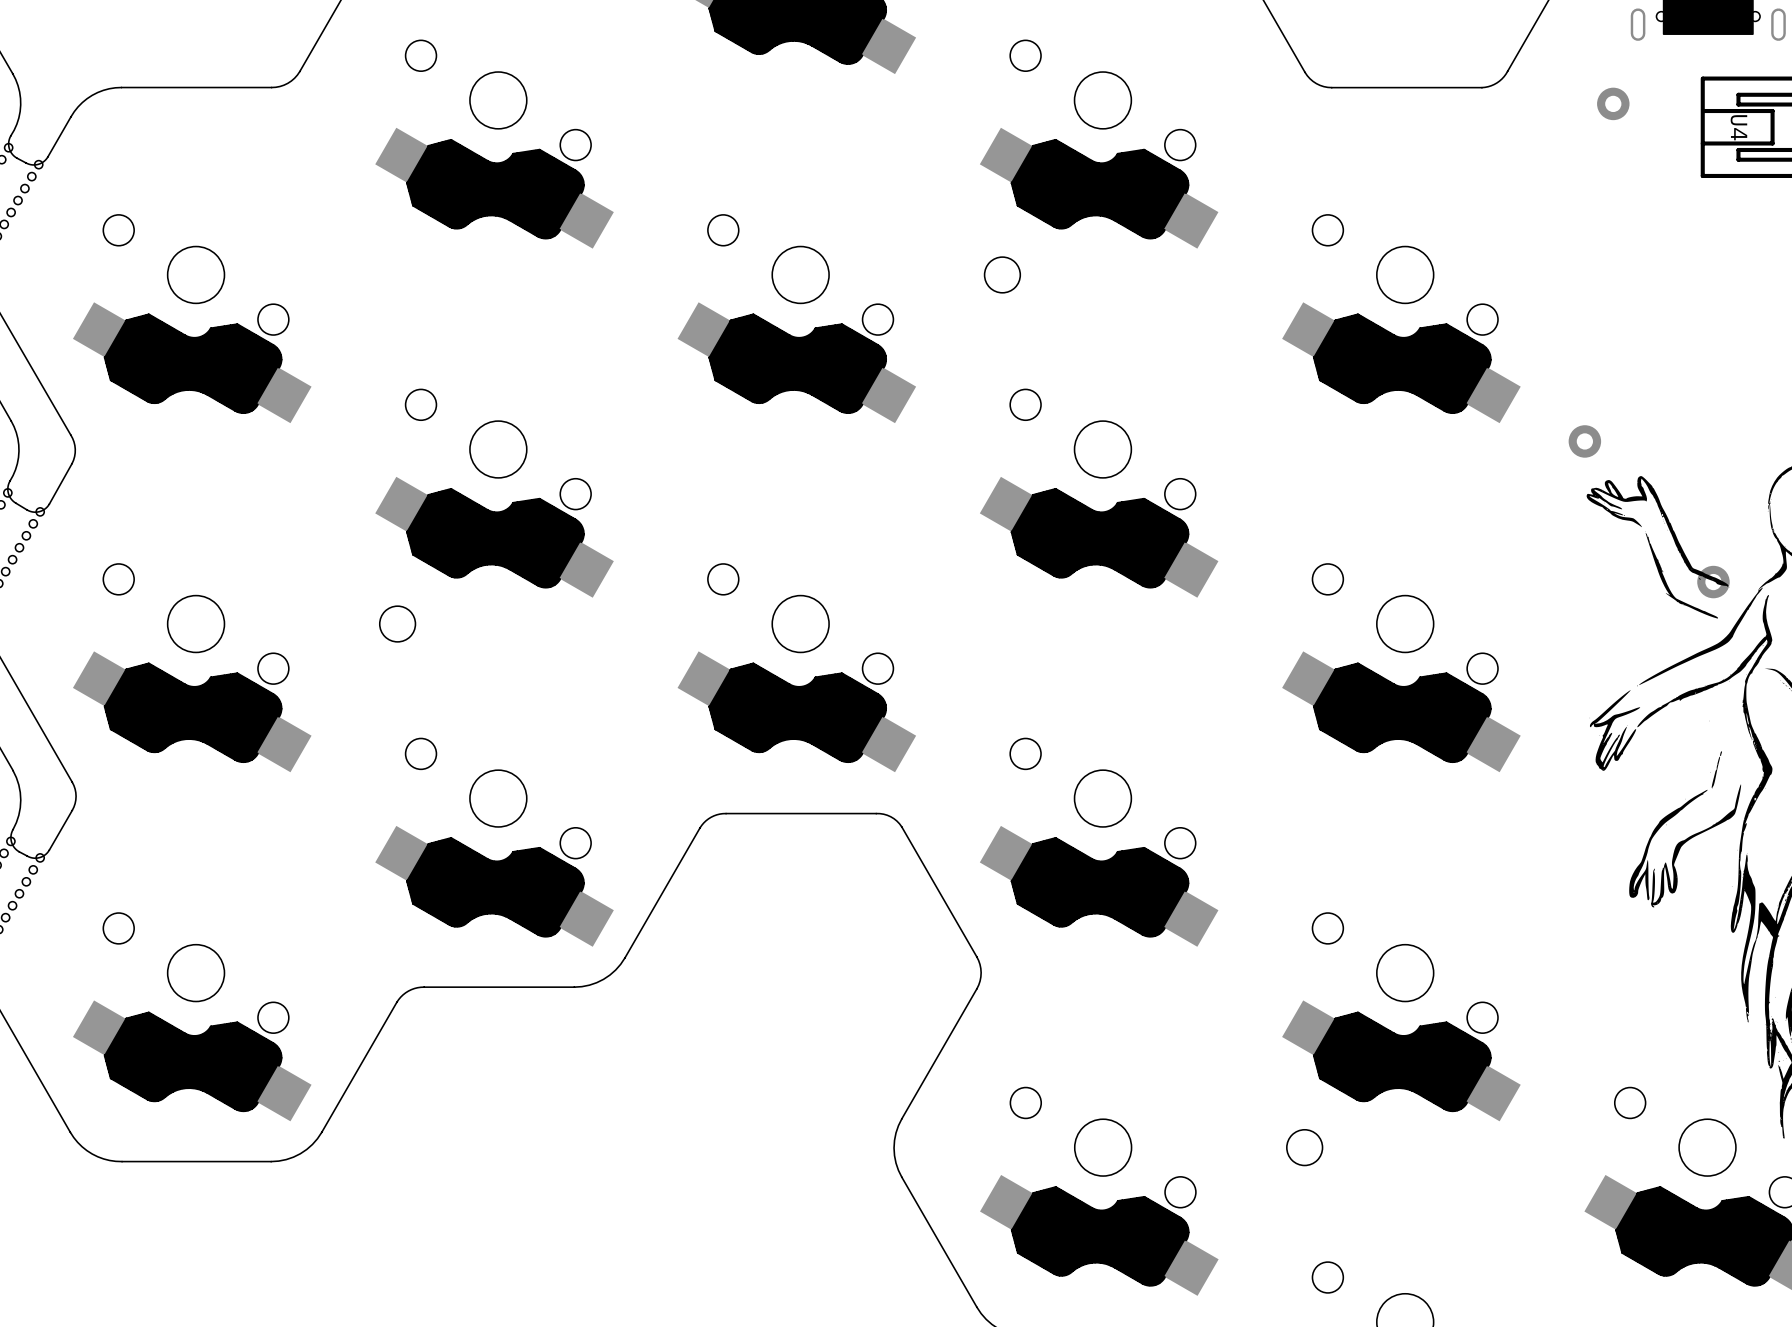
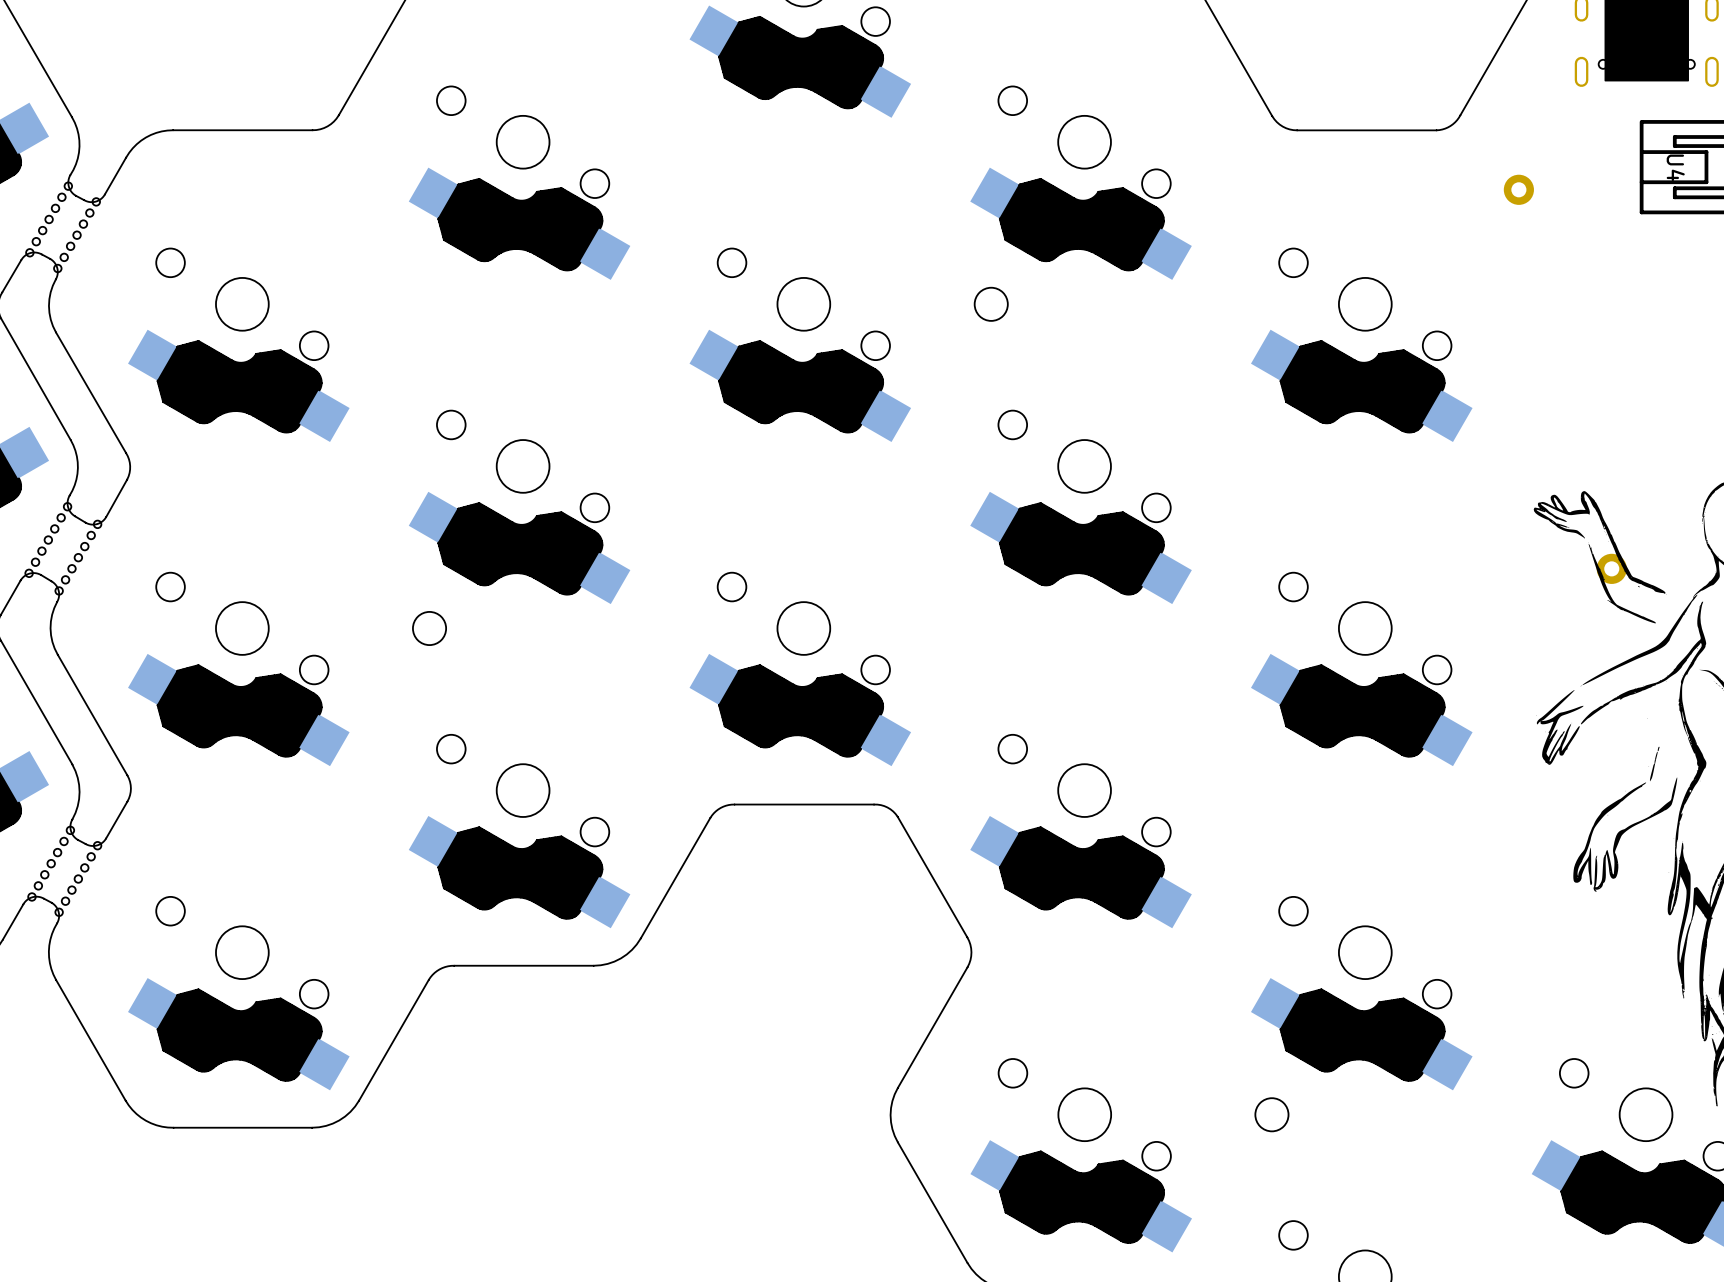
part position: (1613, 103) -> (1518, 189)
part: (1584, 441) -> none
part position: (1713, 582) -> (1611, 568)

